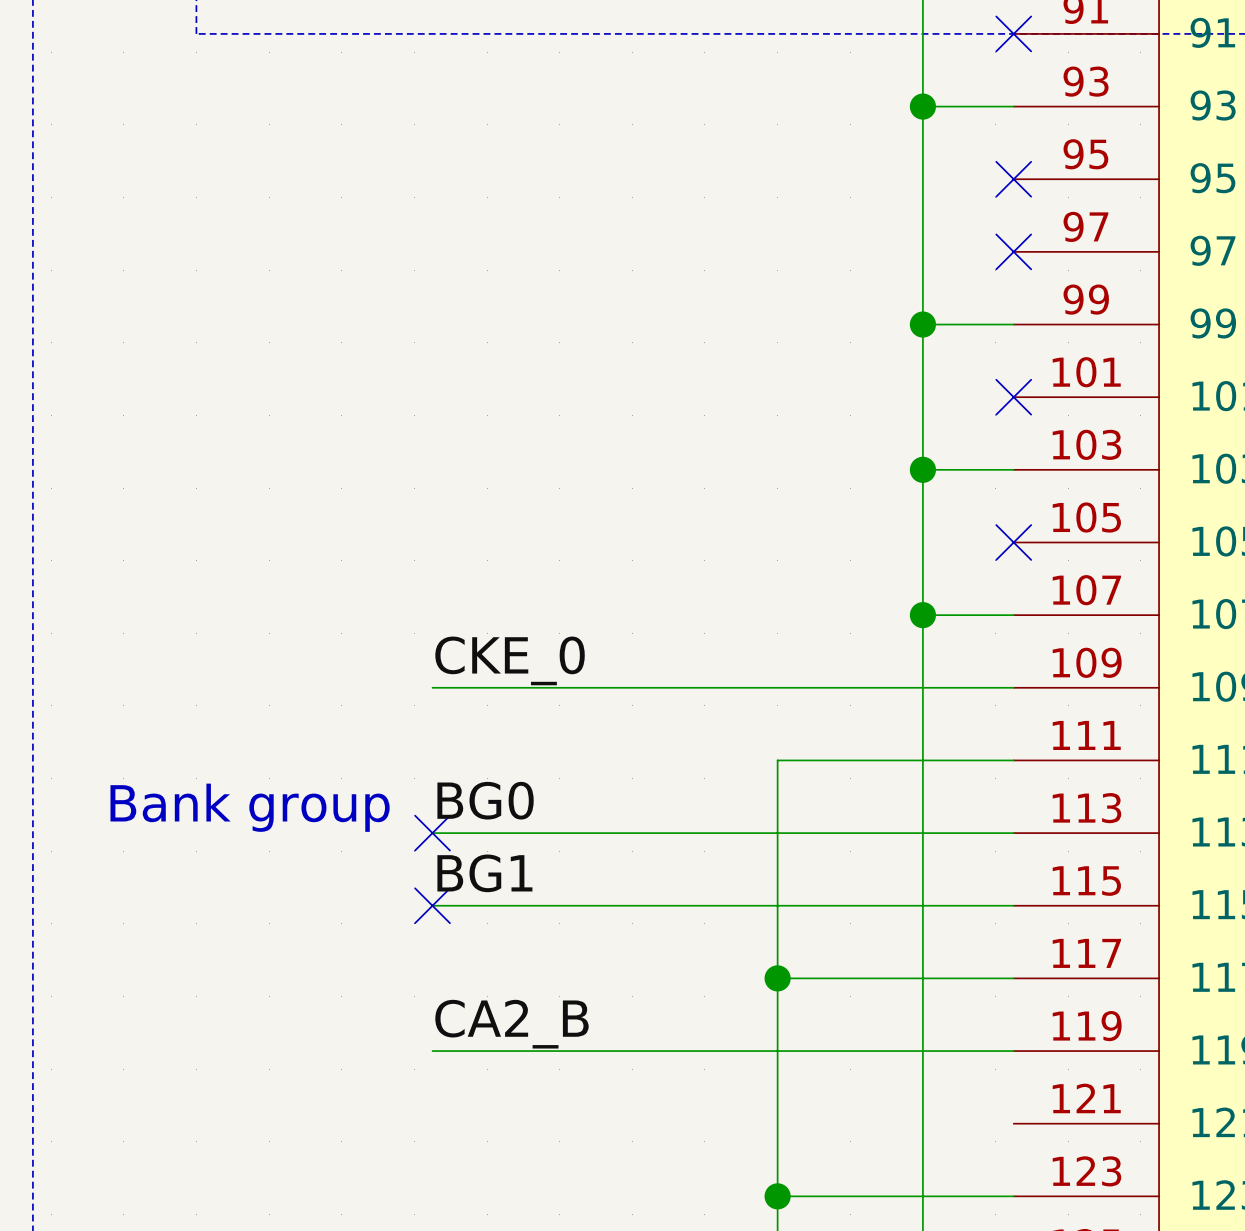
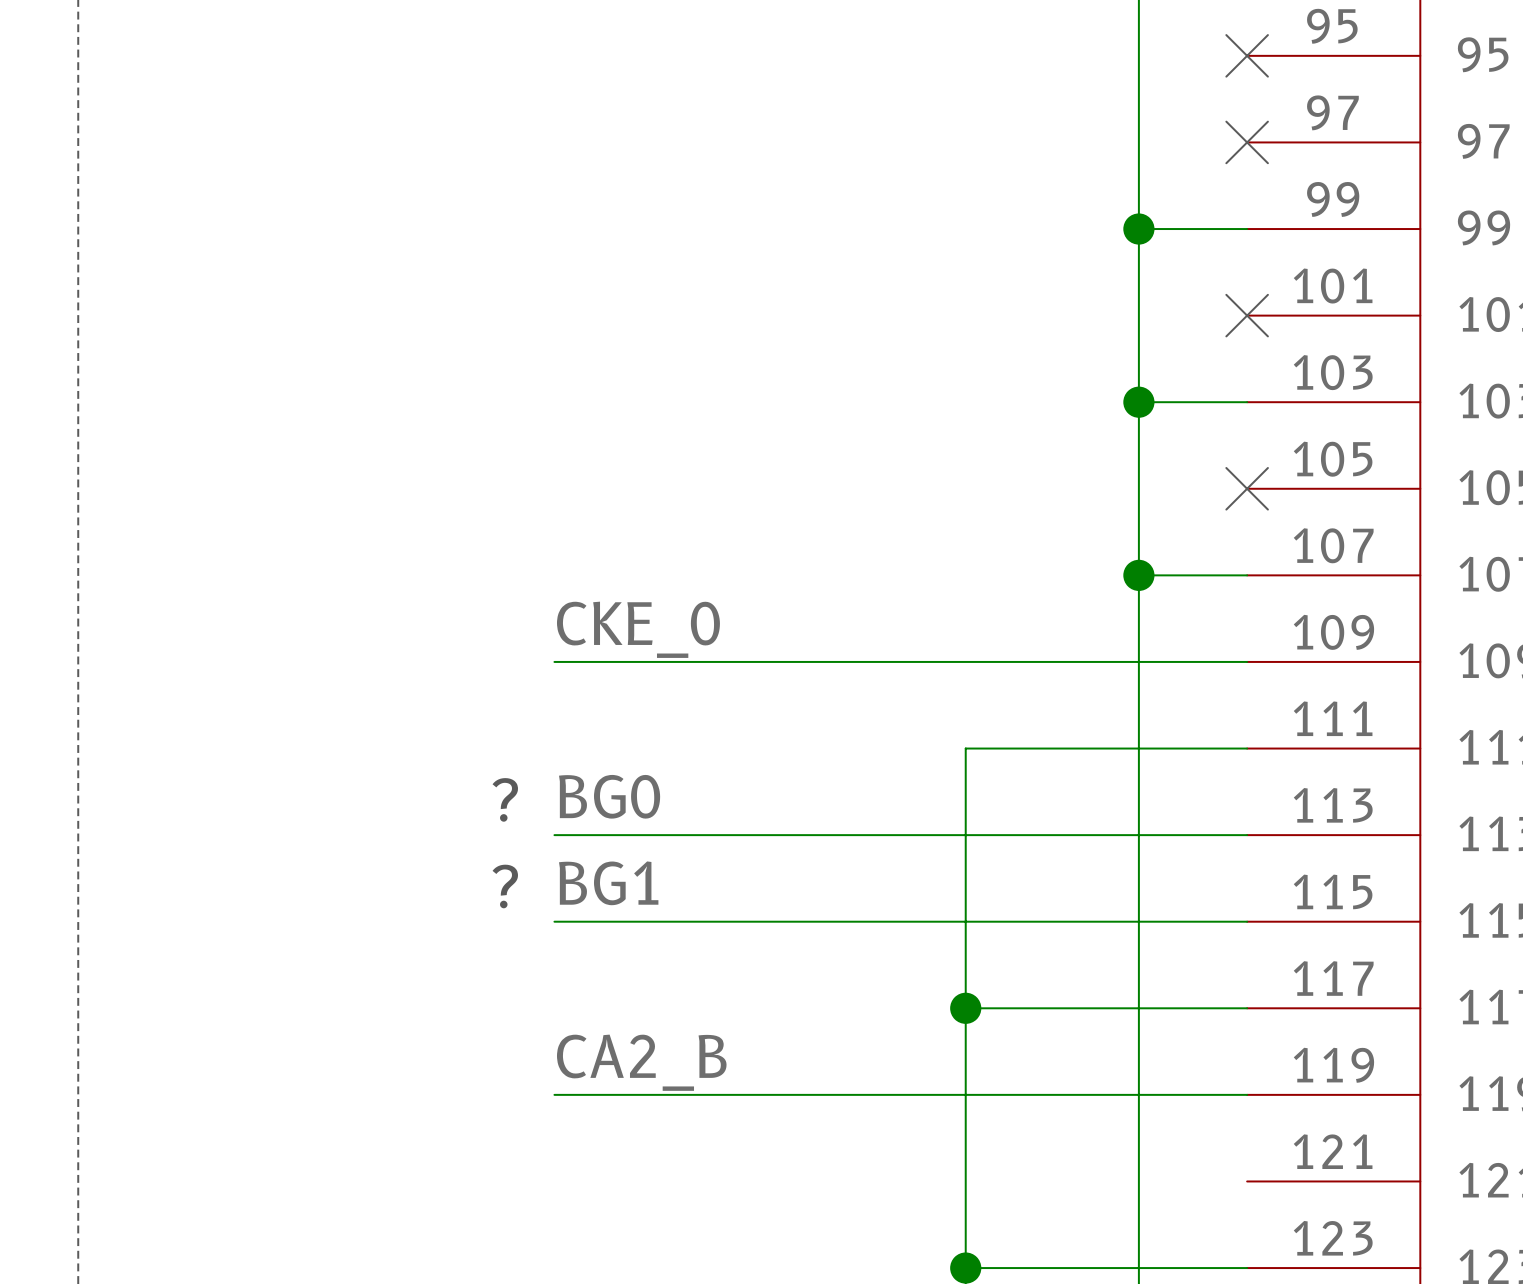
text: none -> ? (505, 799)
text: Bank group (250, 807) -> none
no-connect mark: (432, 833) -> none
text: none -> ? (505, 886)
no-connect mark: (432, 905) -> none

